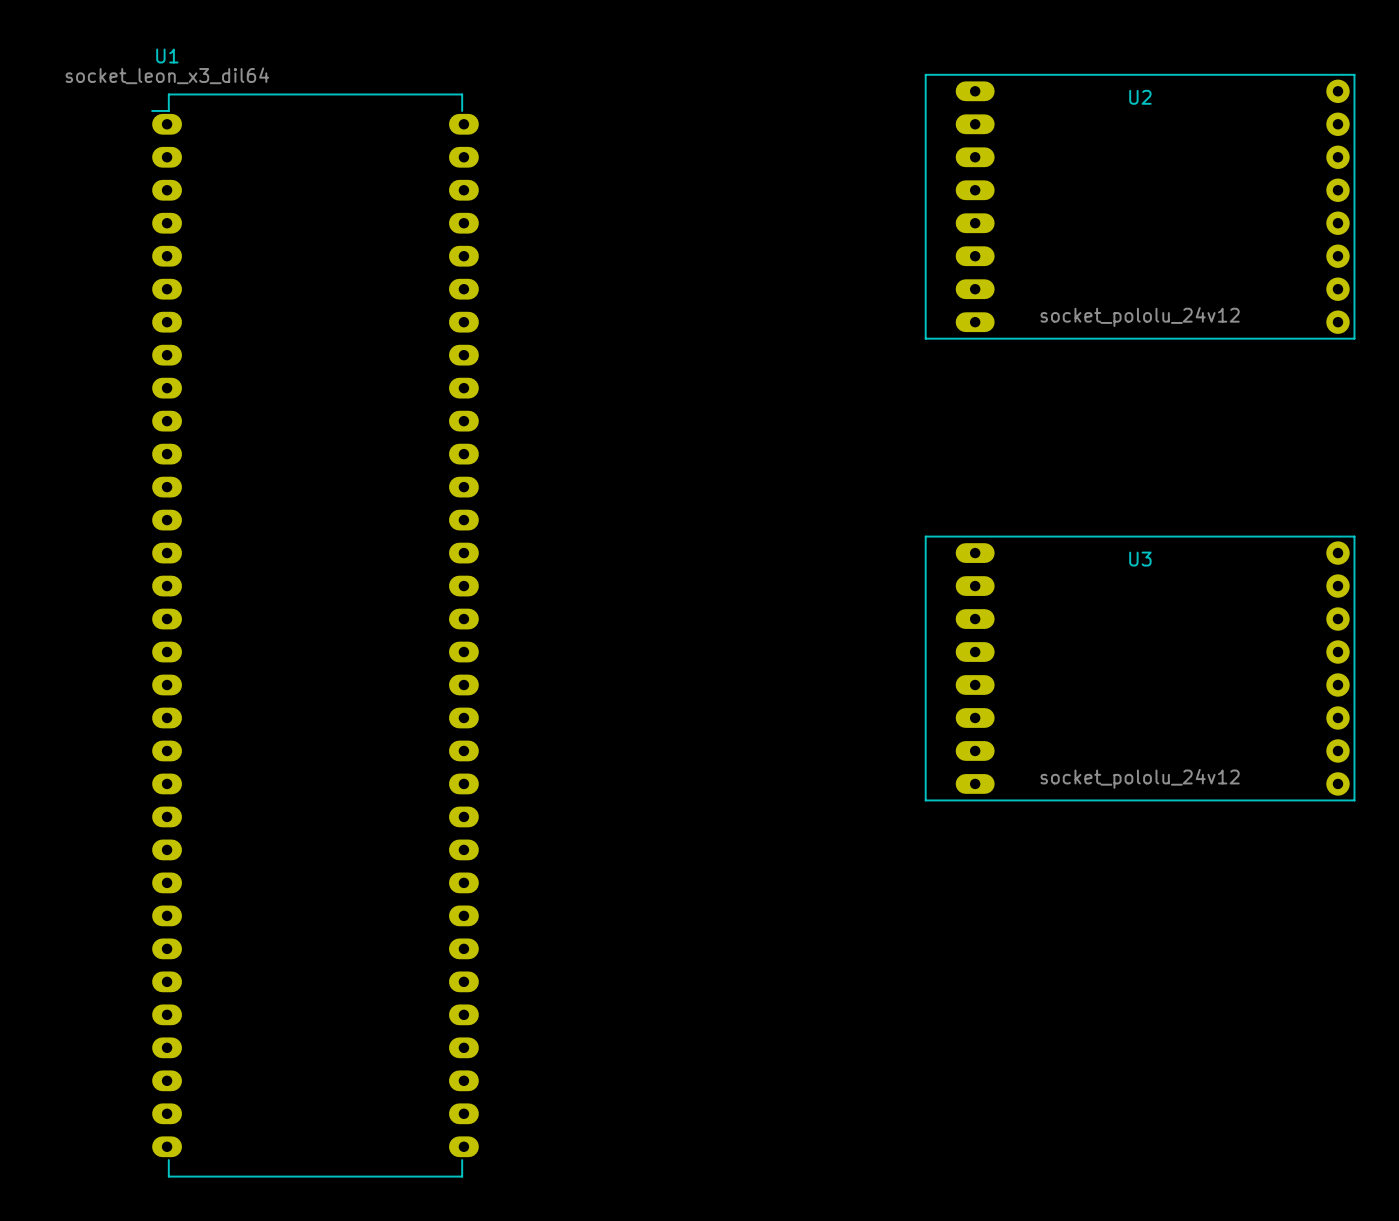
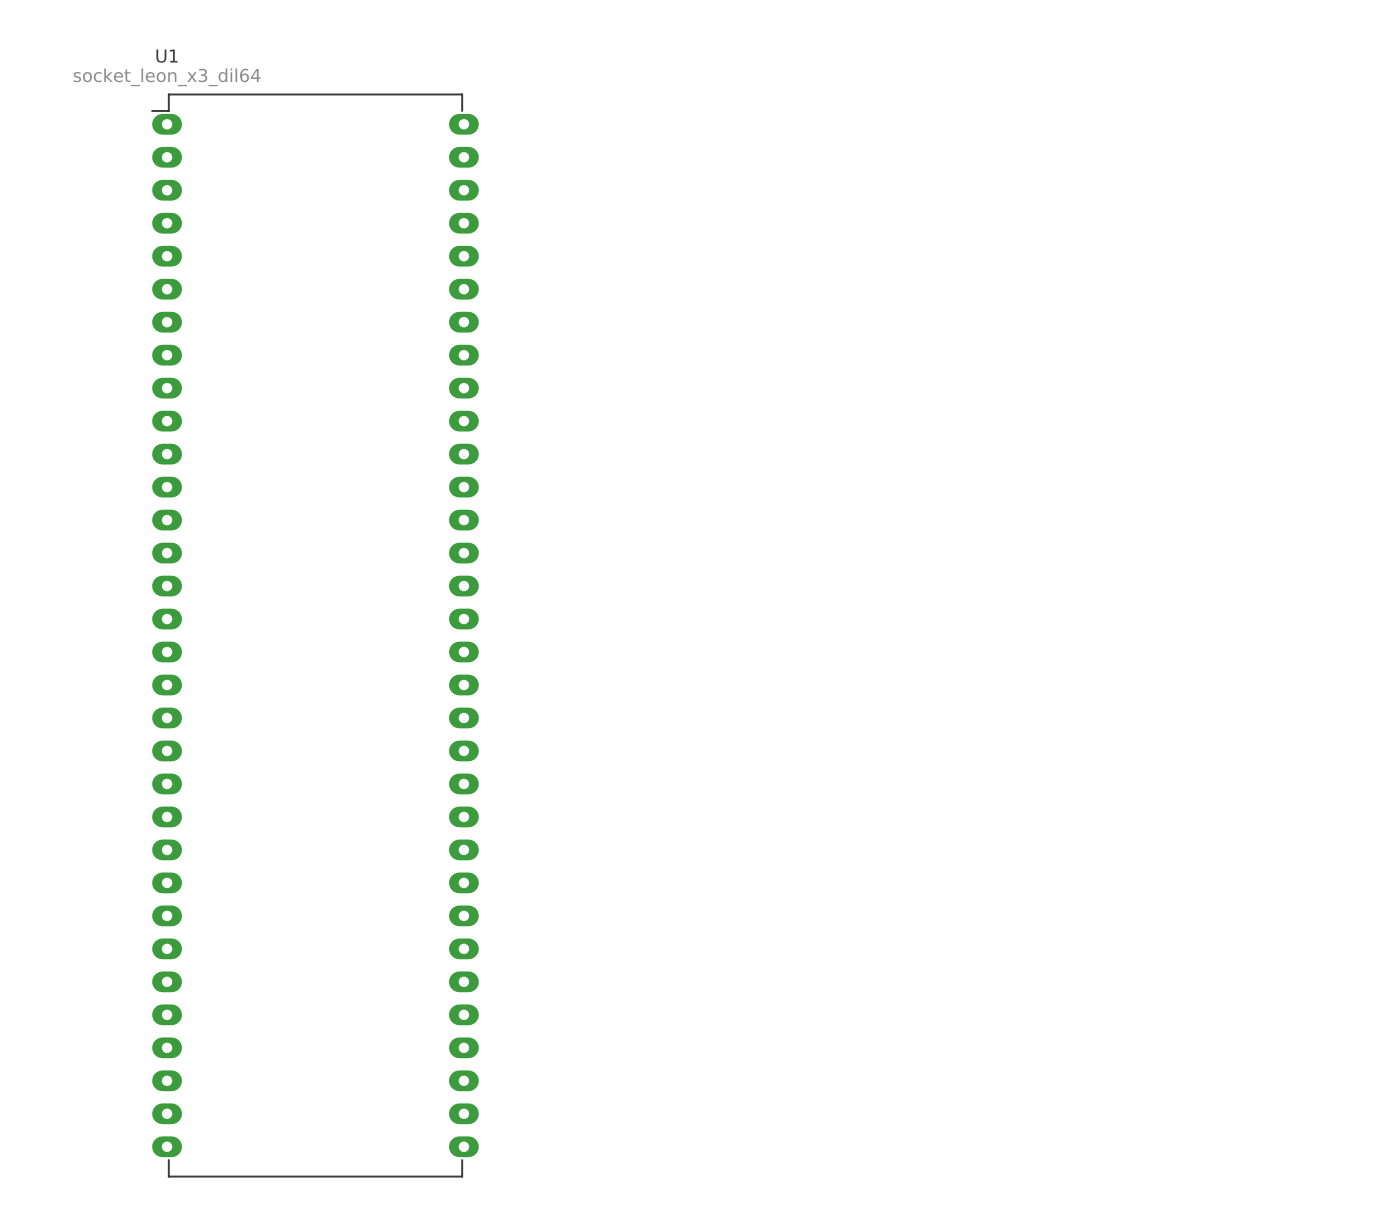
U2: socket_pololu_24v12 (1140, 206) -> none
U3: socket_pololu_24v12 (1140, 668) -> none

